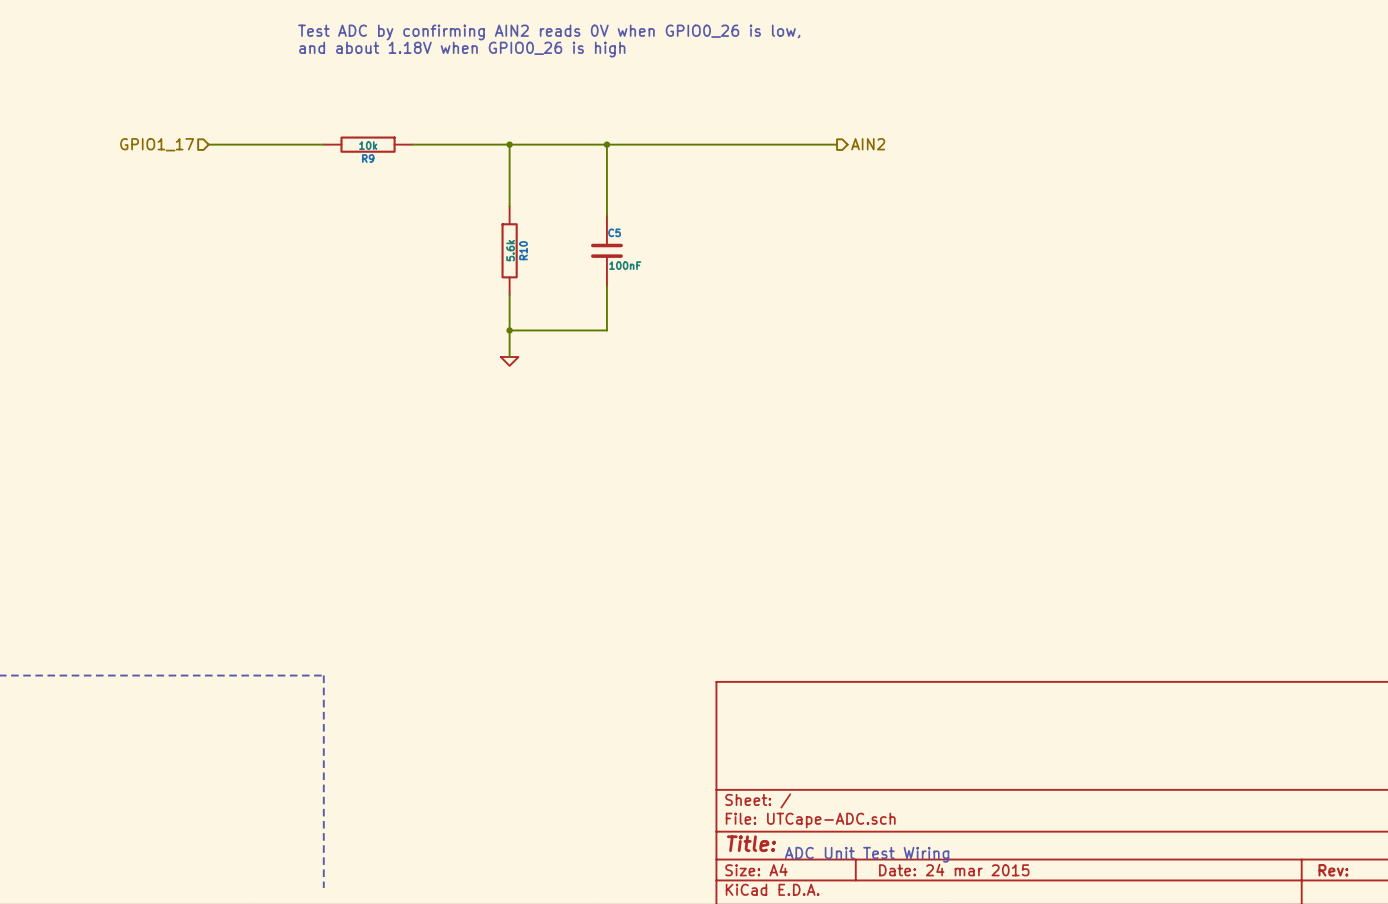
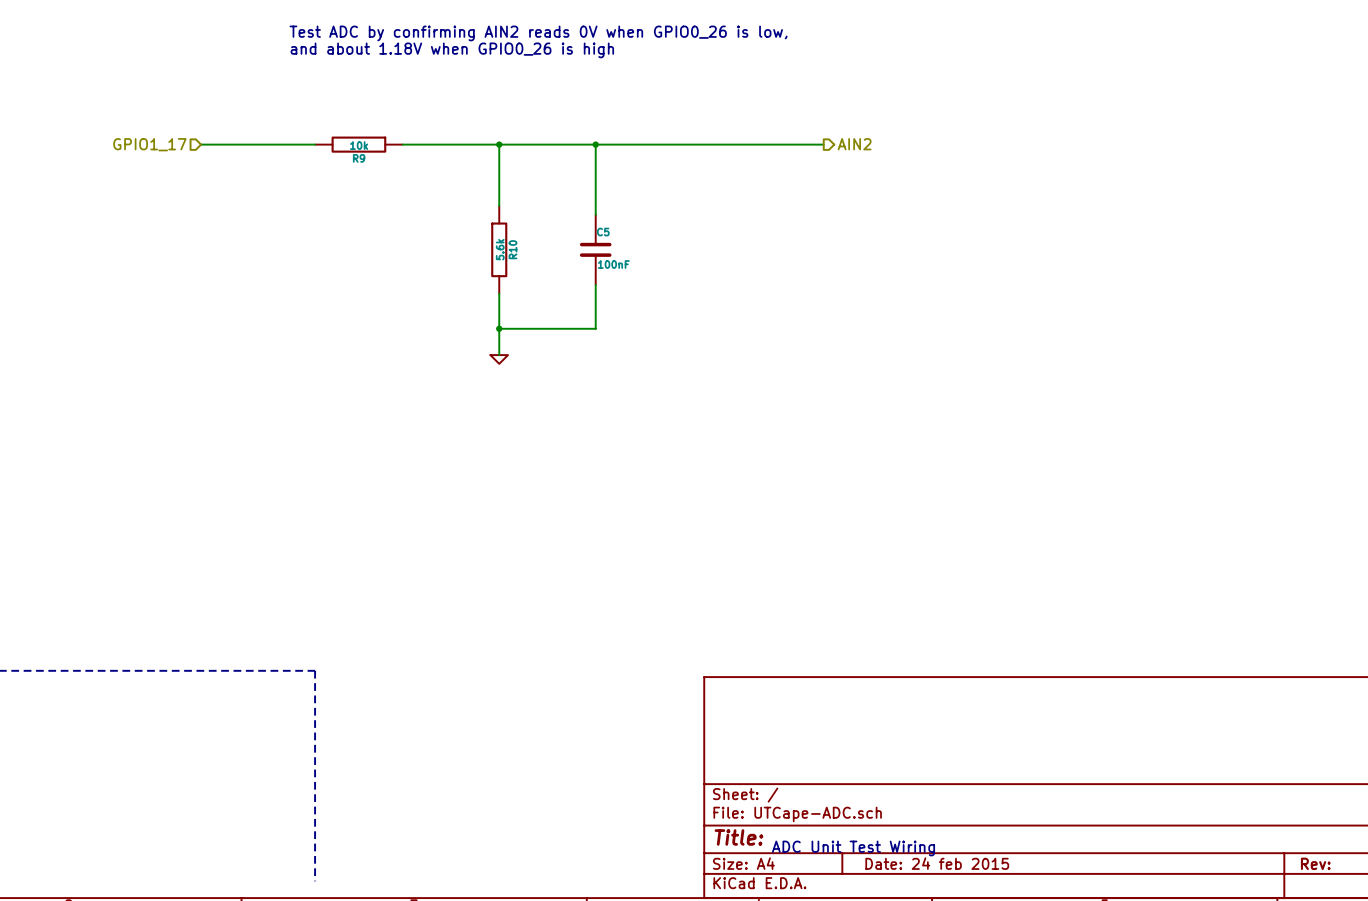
title block: Date: 24 mar 2015 (954, 870) -> Date: 24 feb 2015 (937, 863)

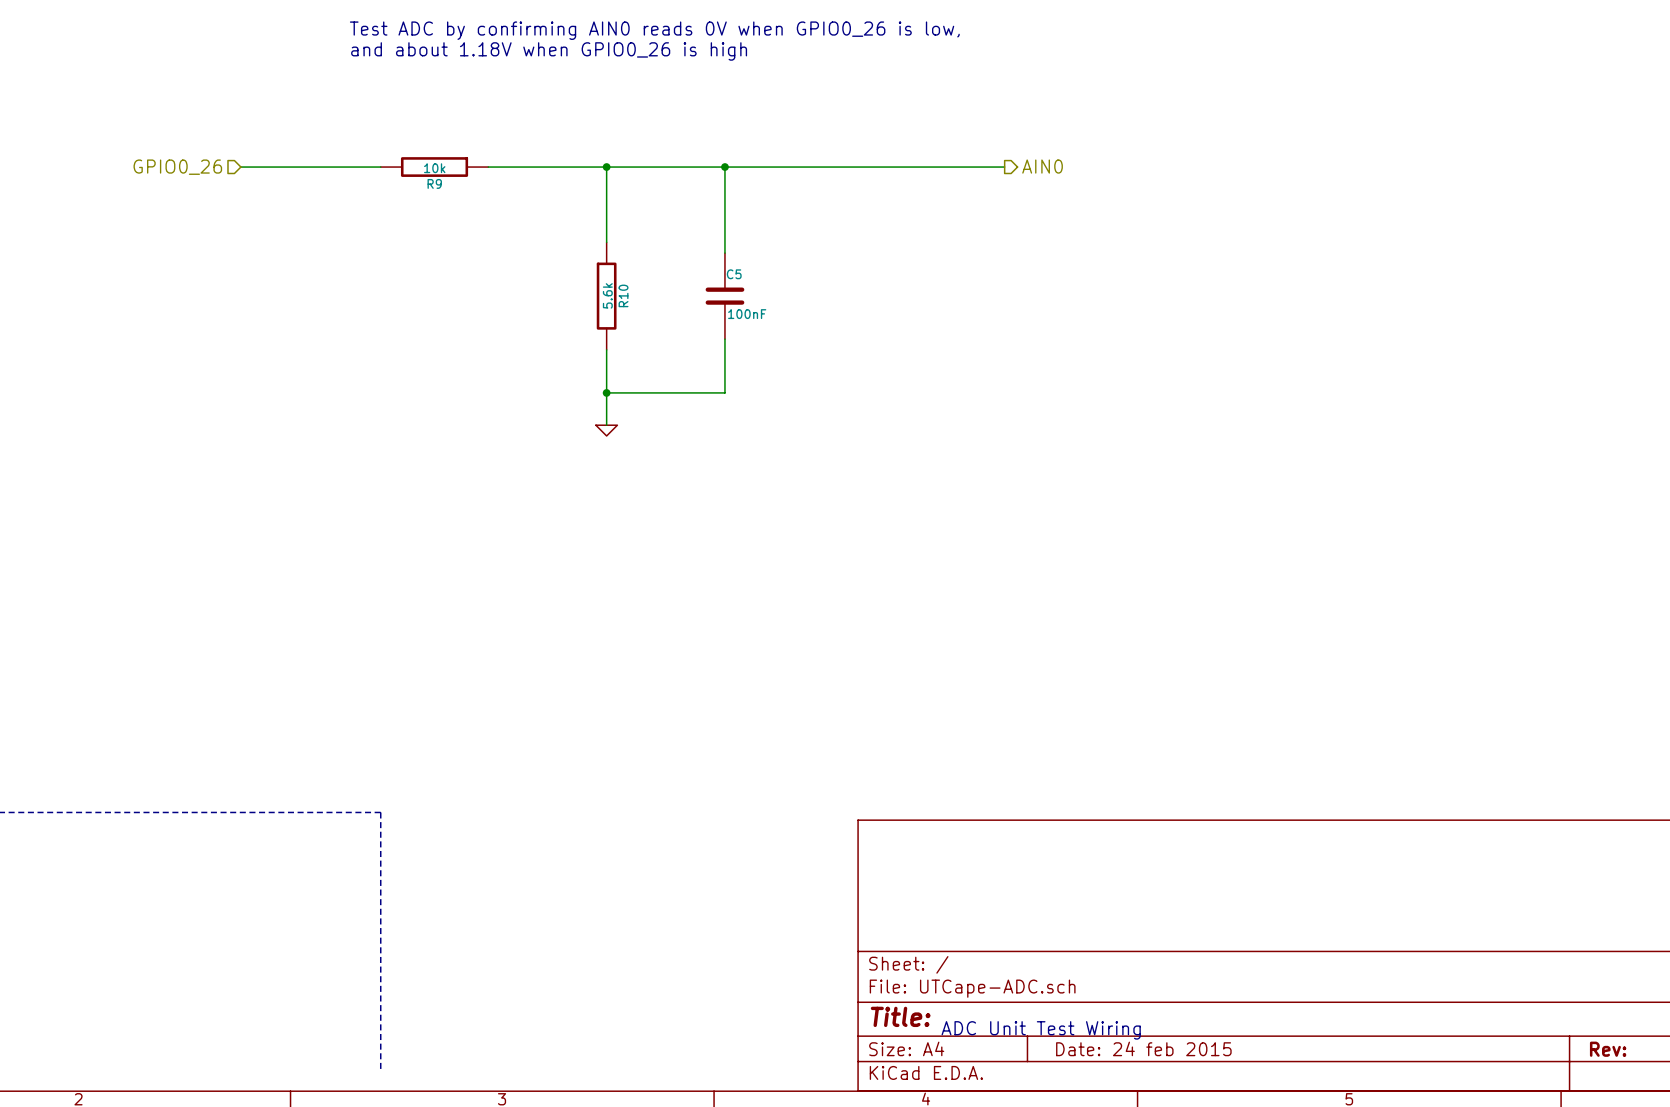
text: Test ADC by confirming AIN2 reads 0V when GPIO0_26 is low, (538, 33) -> Test ADC by confirming AIN0 reads 0V when GPIO0_26 is low, (654, 30)
hierarchical label: GPIO1_17 (149, 144) -> GPIO0_26 (177, 167)
hierarchical label: AIN2 (854, 144) -> AIN0 (1042, 166)

